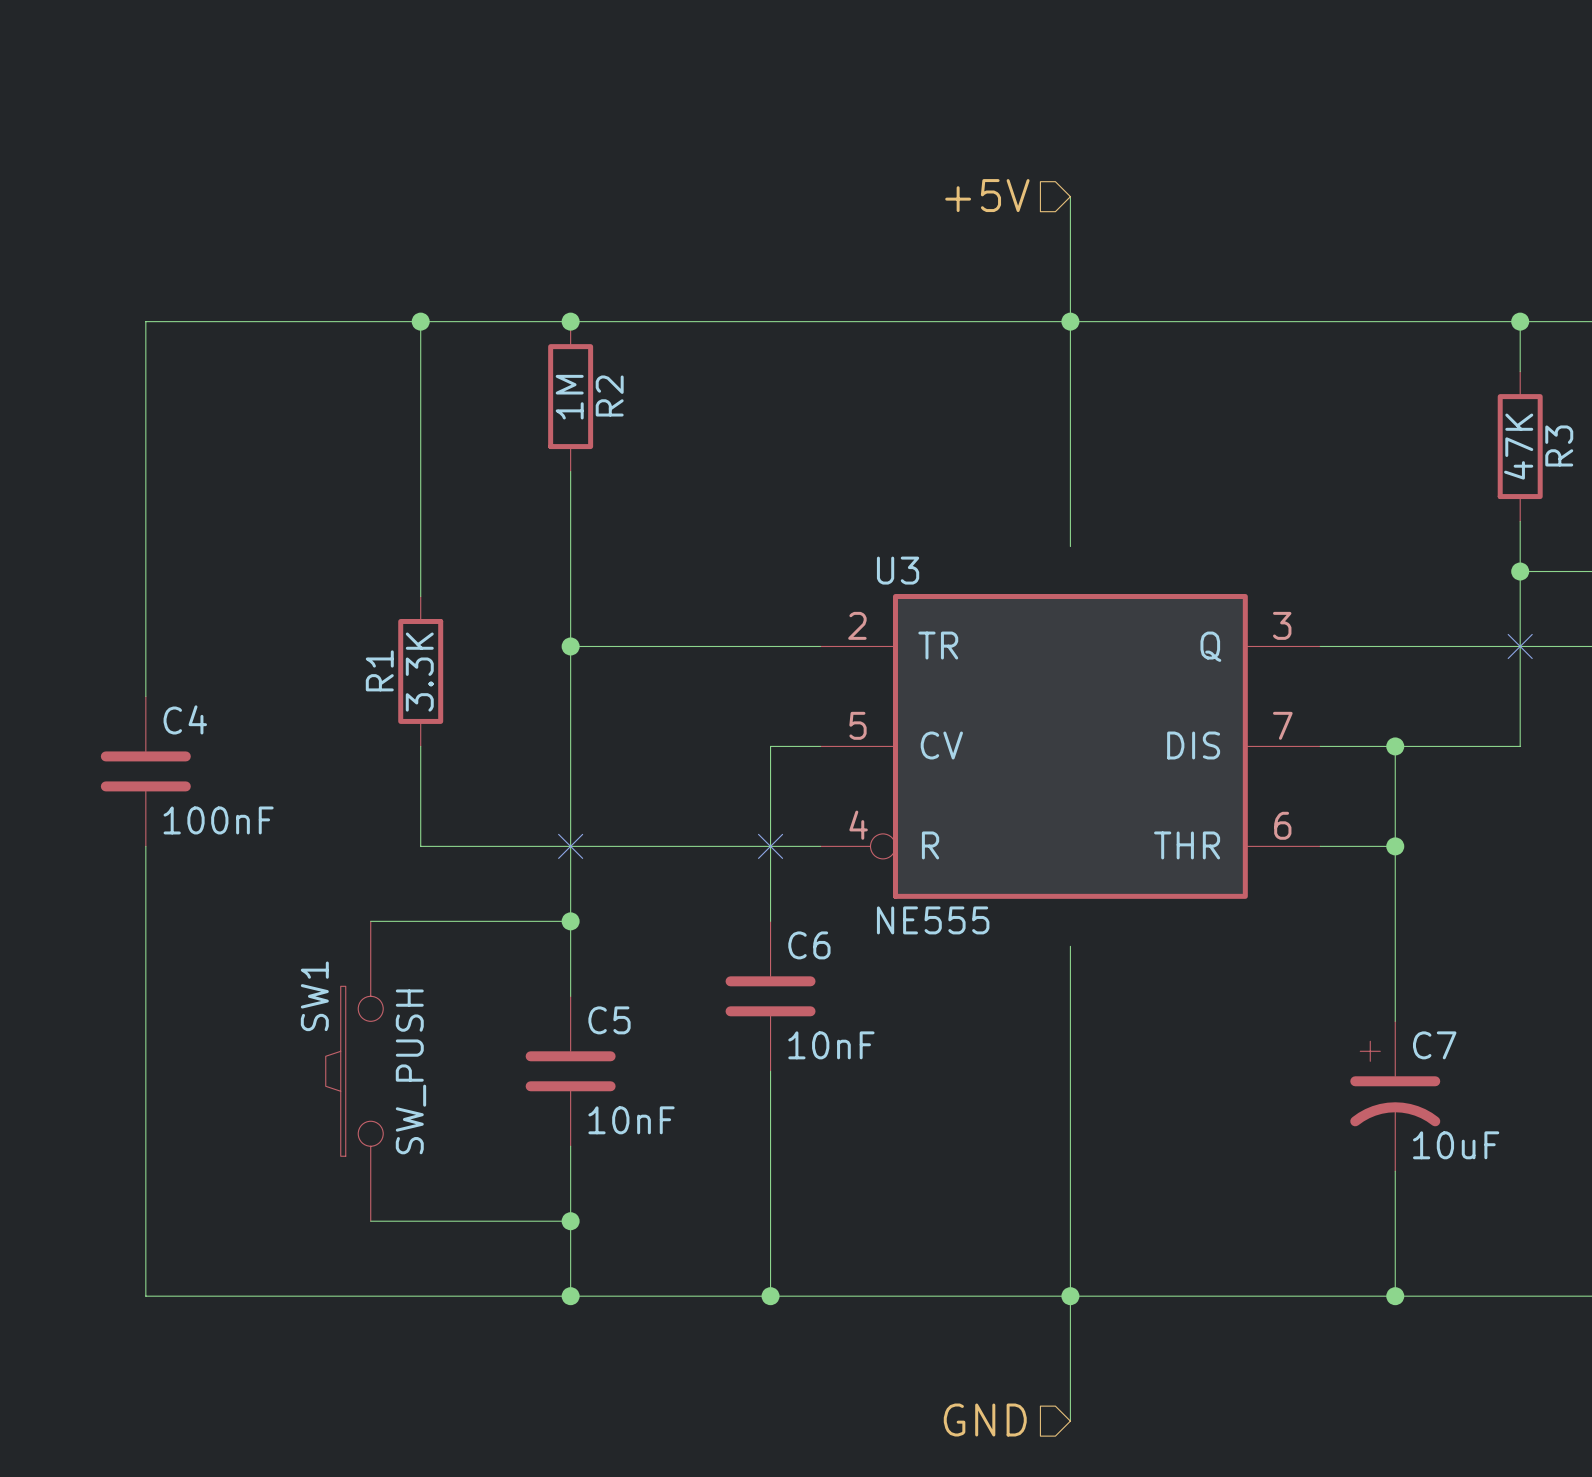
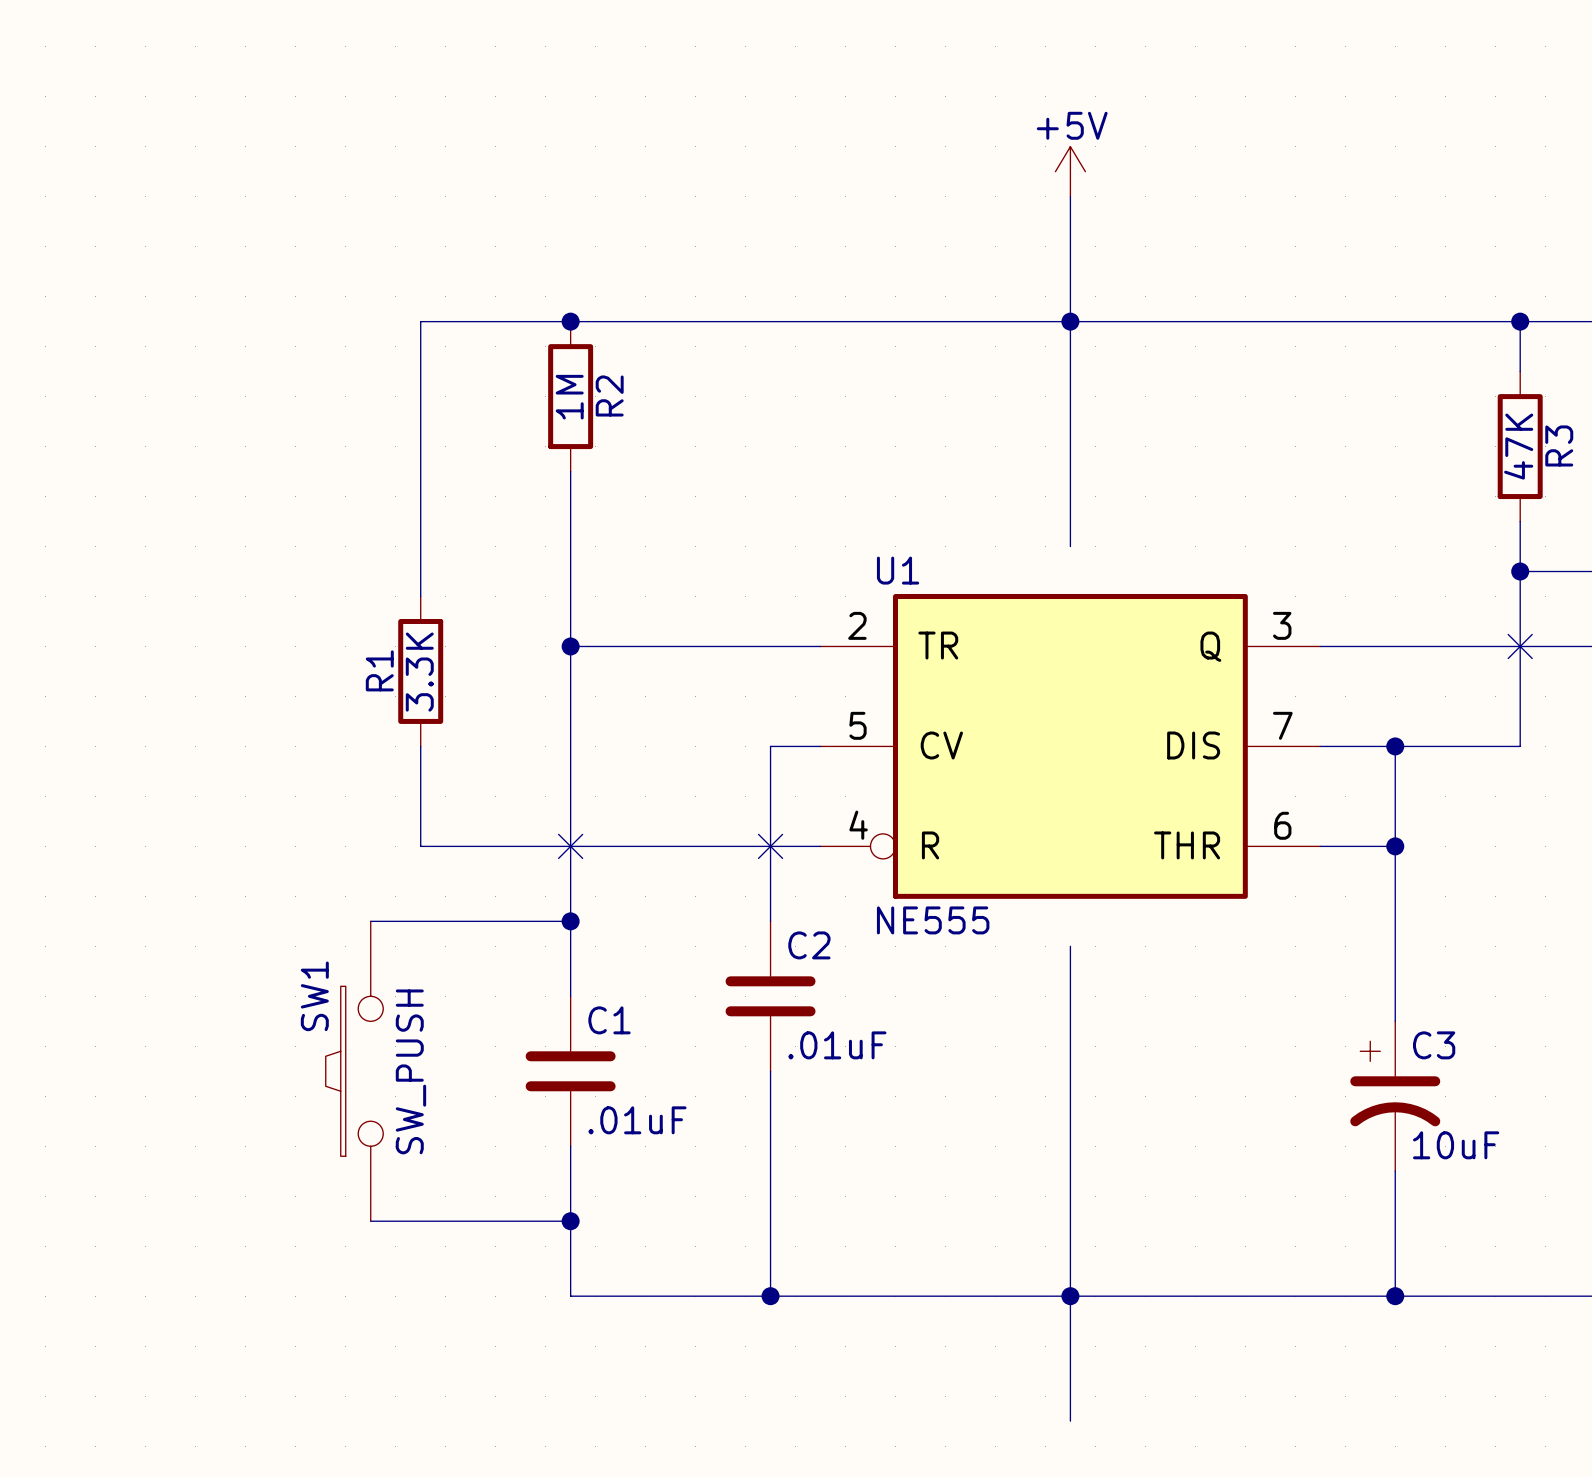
power symbol: none -> +5V (1070, 171)
hierarchical label: +5V (987, 195) -> none
wire: (420, 321) (145, 321) (145, 696) -> none
junction: (420, 321) -> none
U3 name: U3 (898, 570) -> U1 (898, 570)
C4: 100nF (145, 771) -> none
wire: (145, 846) (145, 1296) (570, 1296) -> none
C6 name: C6 (809, 945) -> C2 (809, 945)
C5 name: C5 (609, 1020) -> C1 (609, 1020)
C6 value: 10nF (831, 1045) -> .01uF (837, 1045)
C7 name: C7 (1434, 1045) -> C3 (1434, 1045)
C5 value: 10nF (631, 1120) -> .01uF (637, 1120)
junction: (570, 1296) -> none
hierarchical label: GND (985, 1420) -> none

